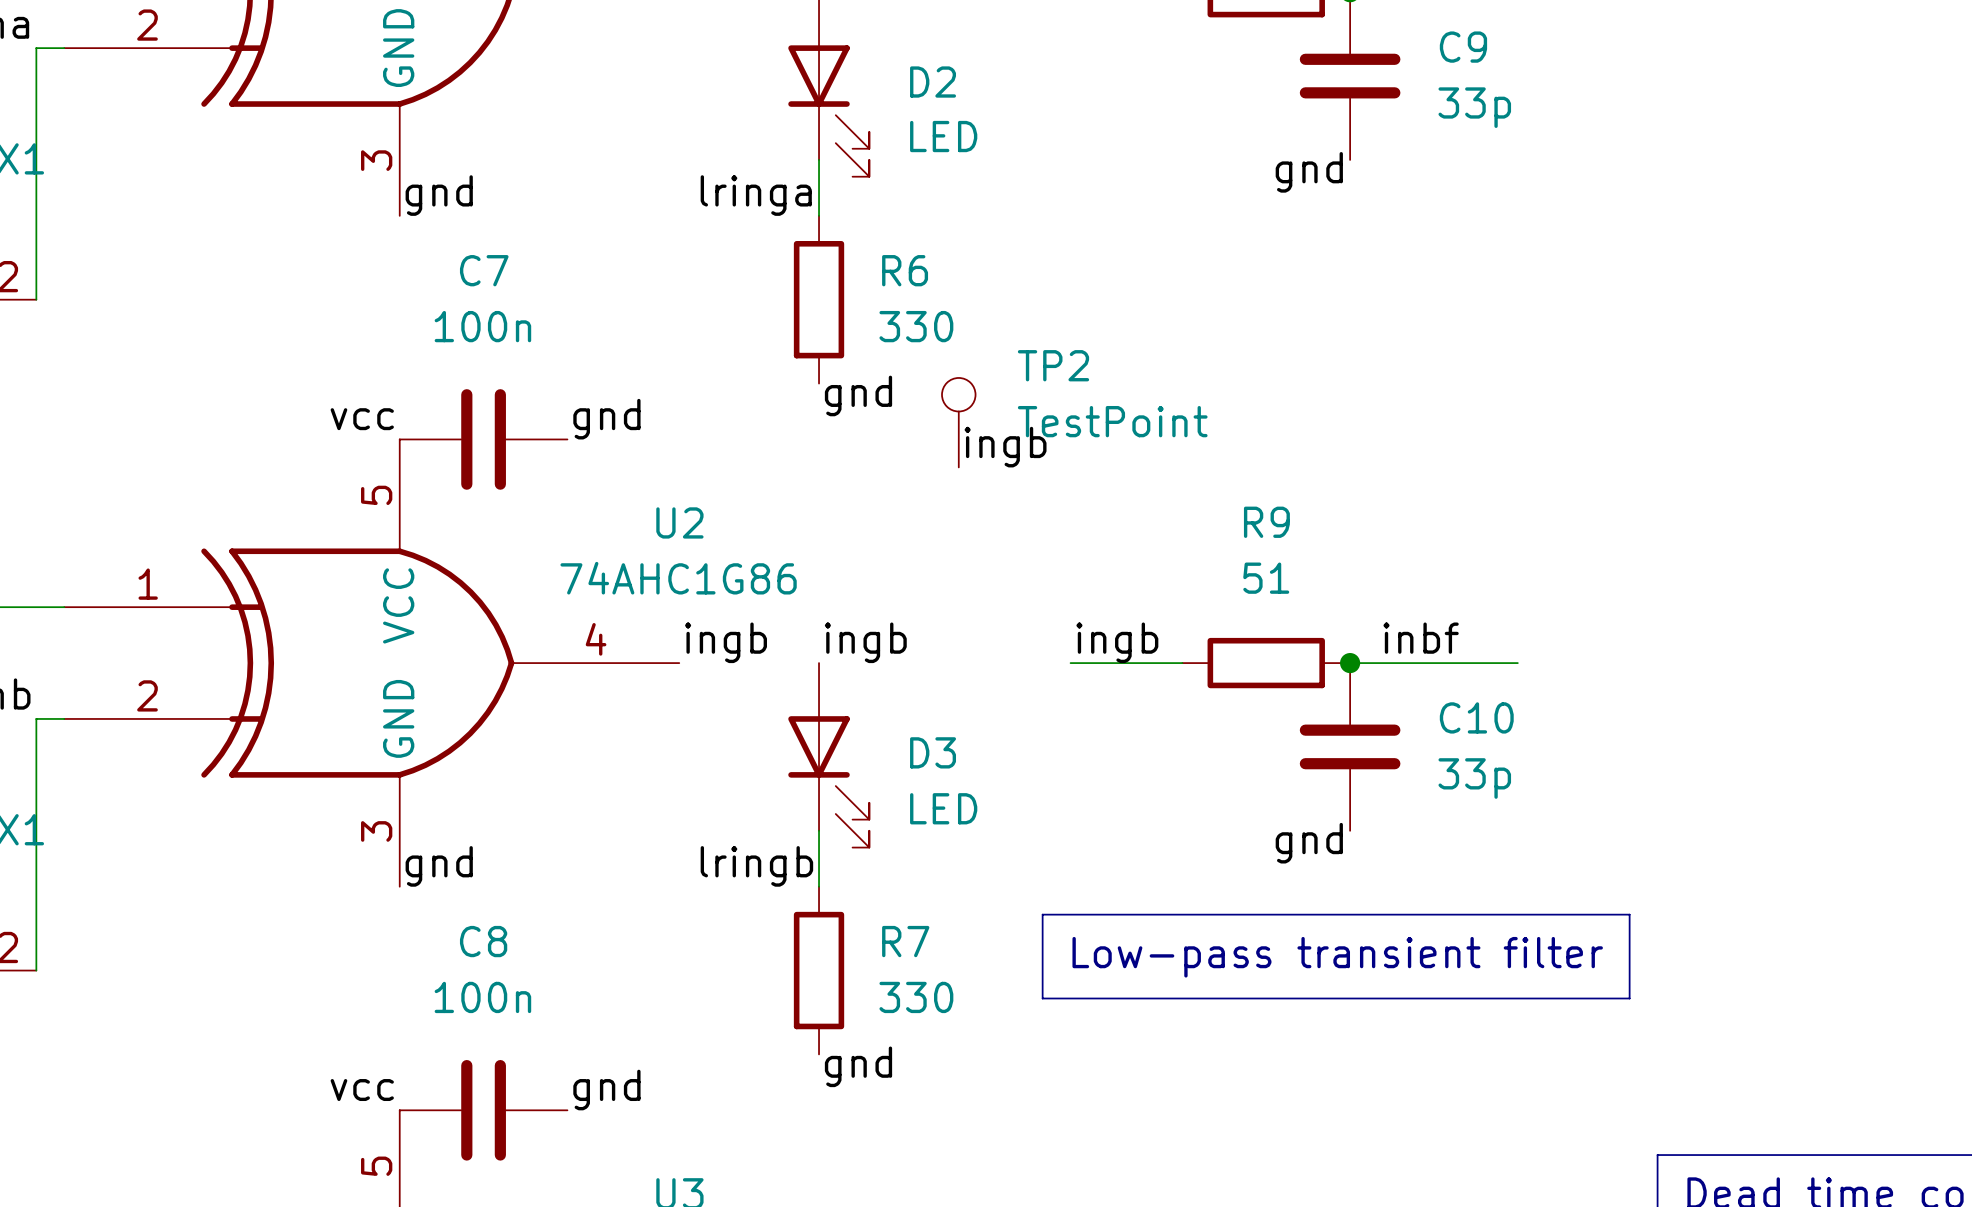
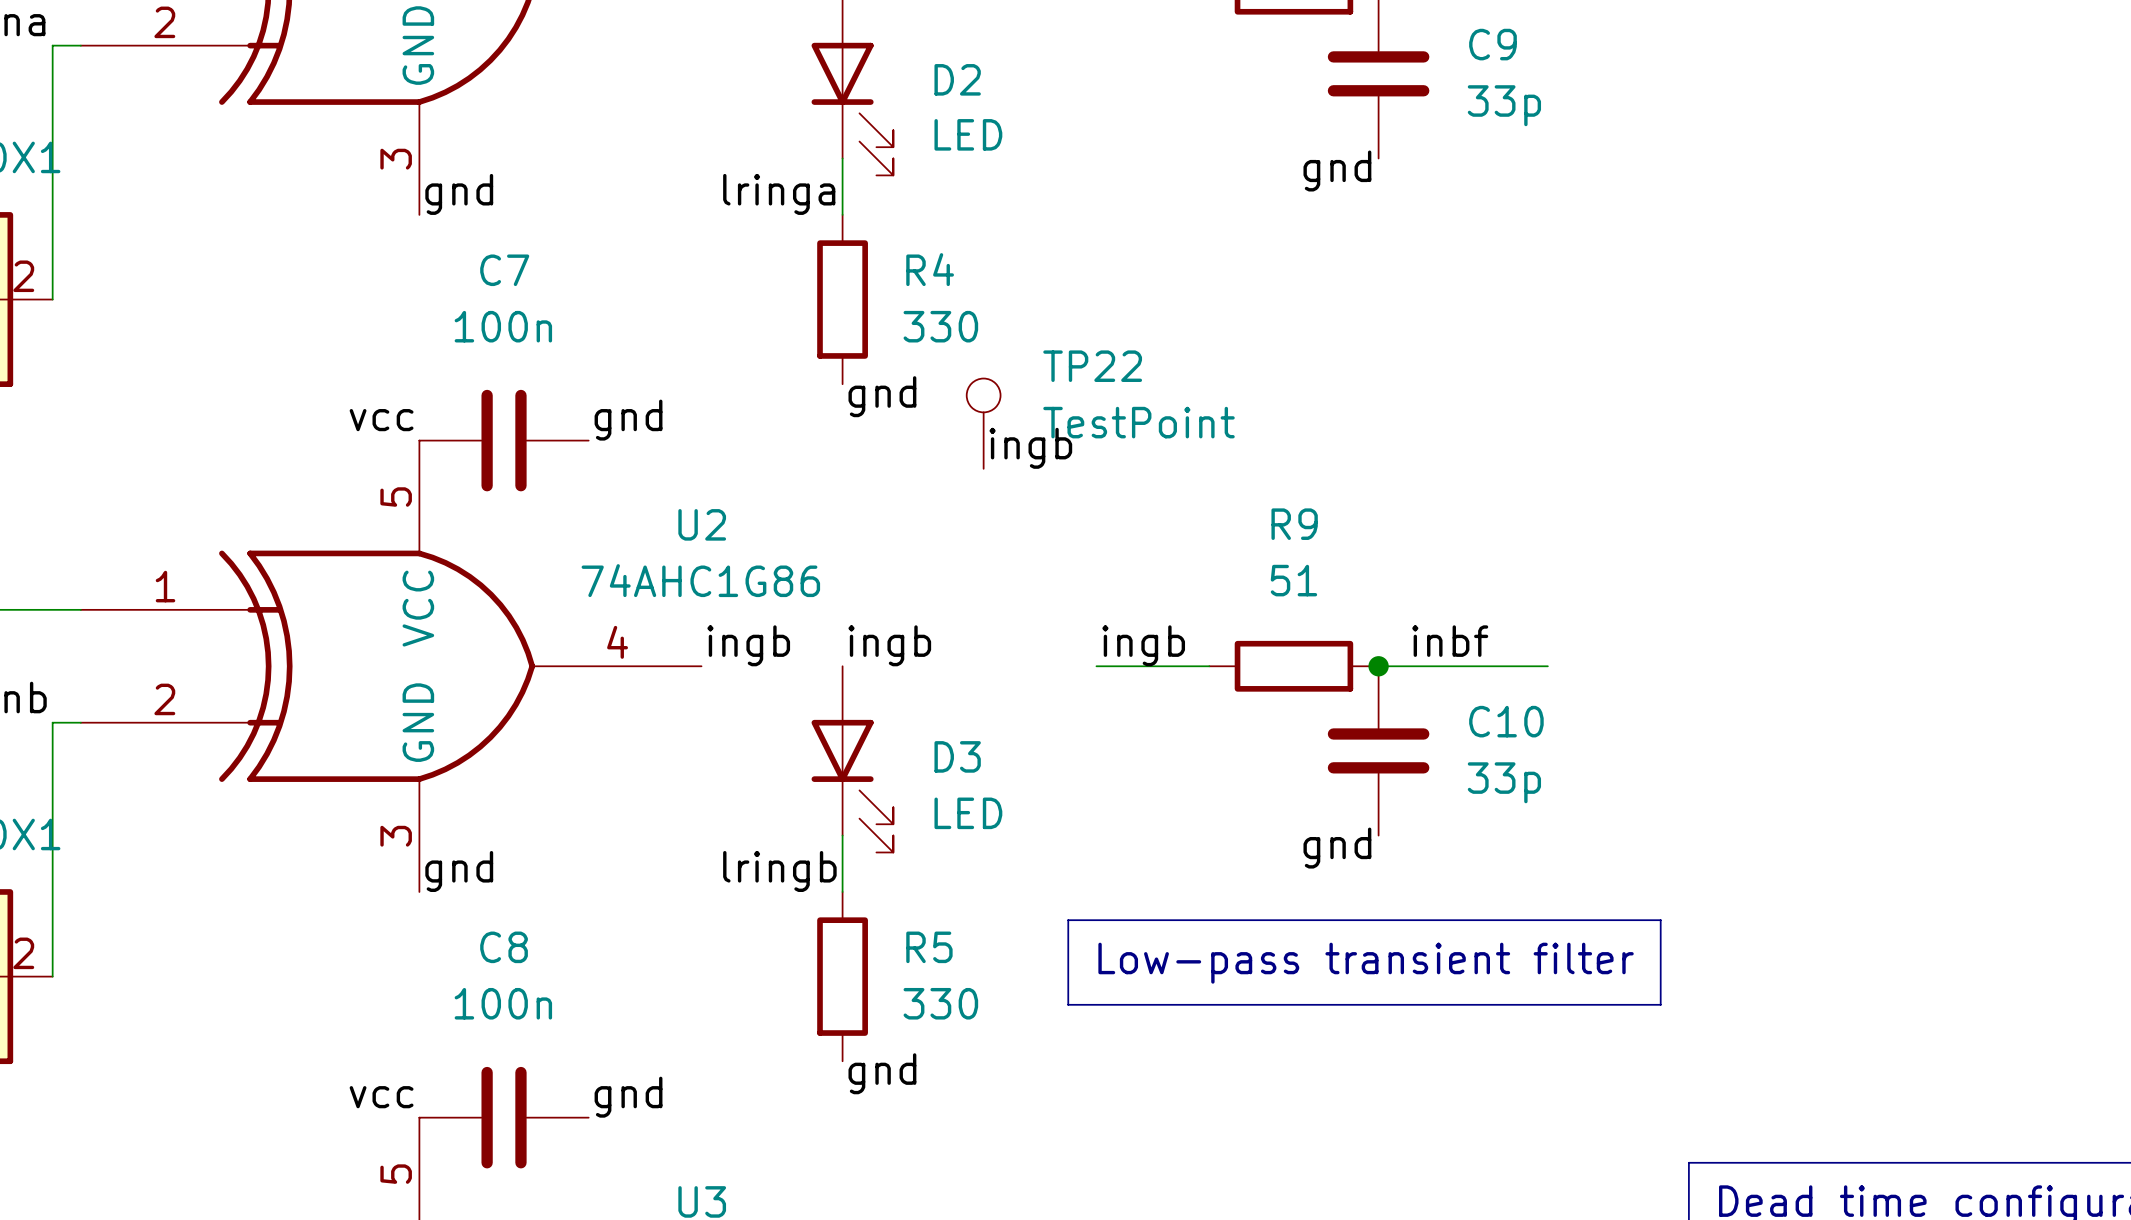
R6 name: R6 (905, 270) -> R4 (930, 269)
TP2 name: TP2 (1053, 365) -> TP22 (1092, 366)
R7 name: R7 (905, 941) -> R5 (929, 947)

